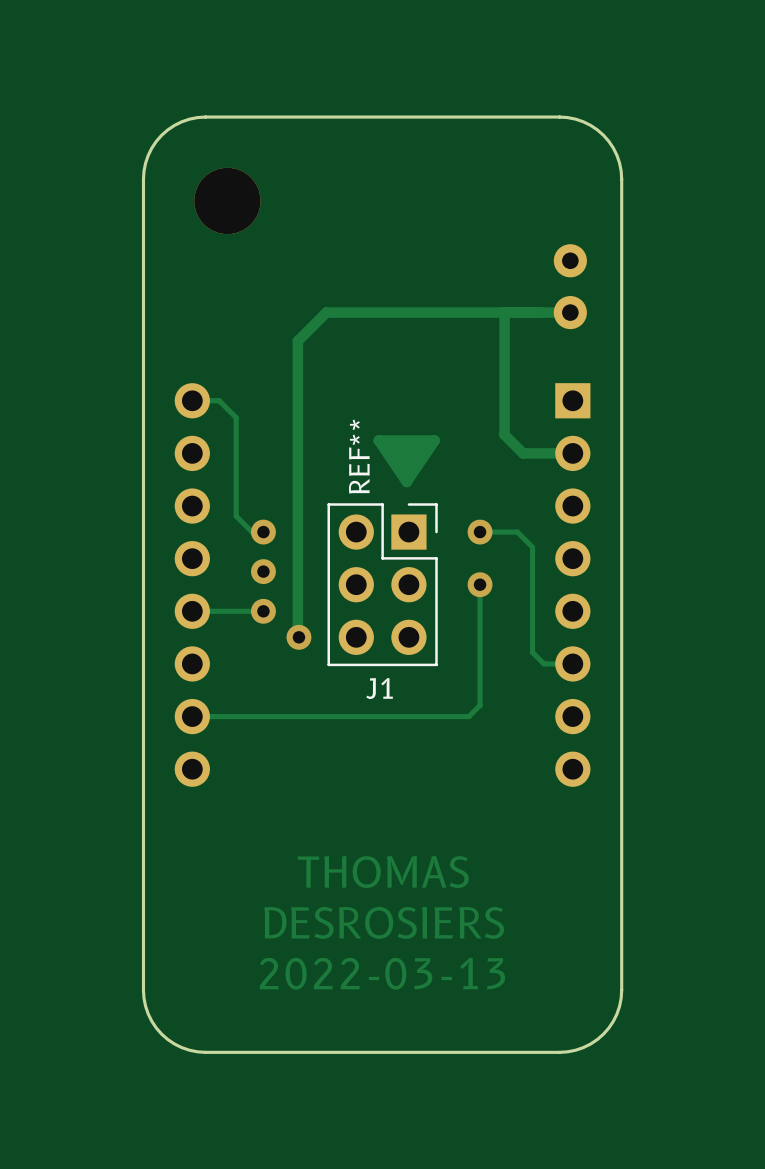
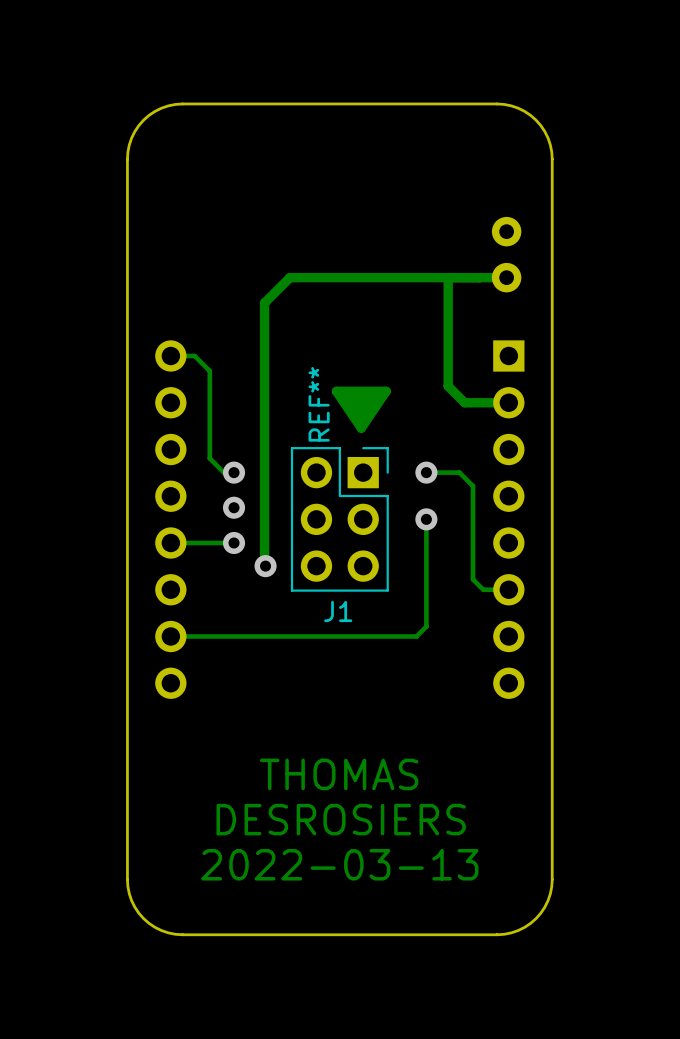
part: (227, 200) -> none

